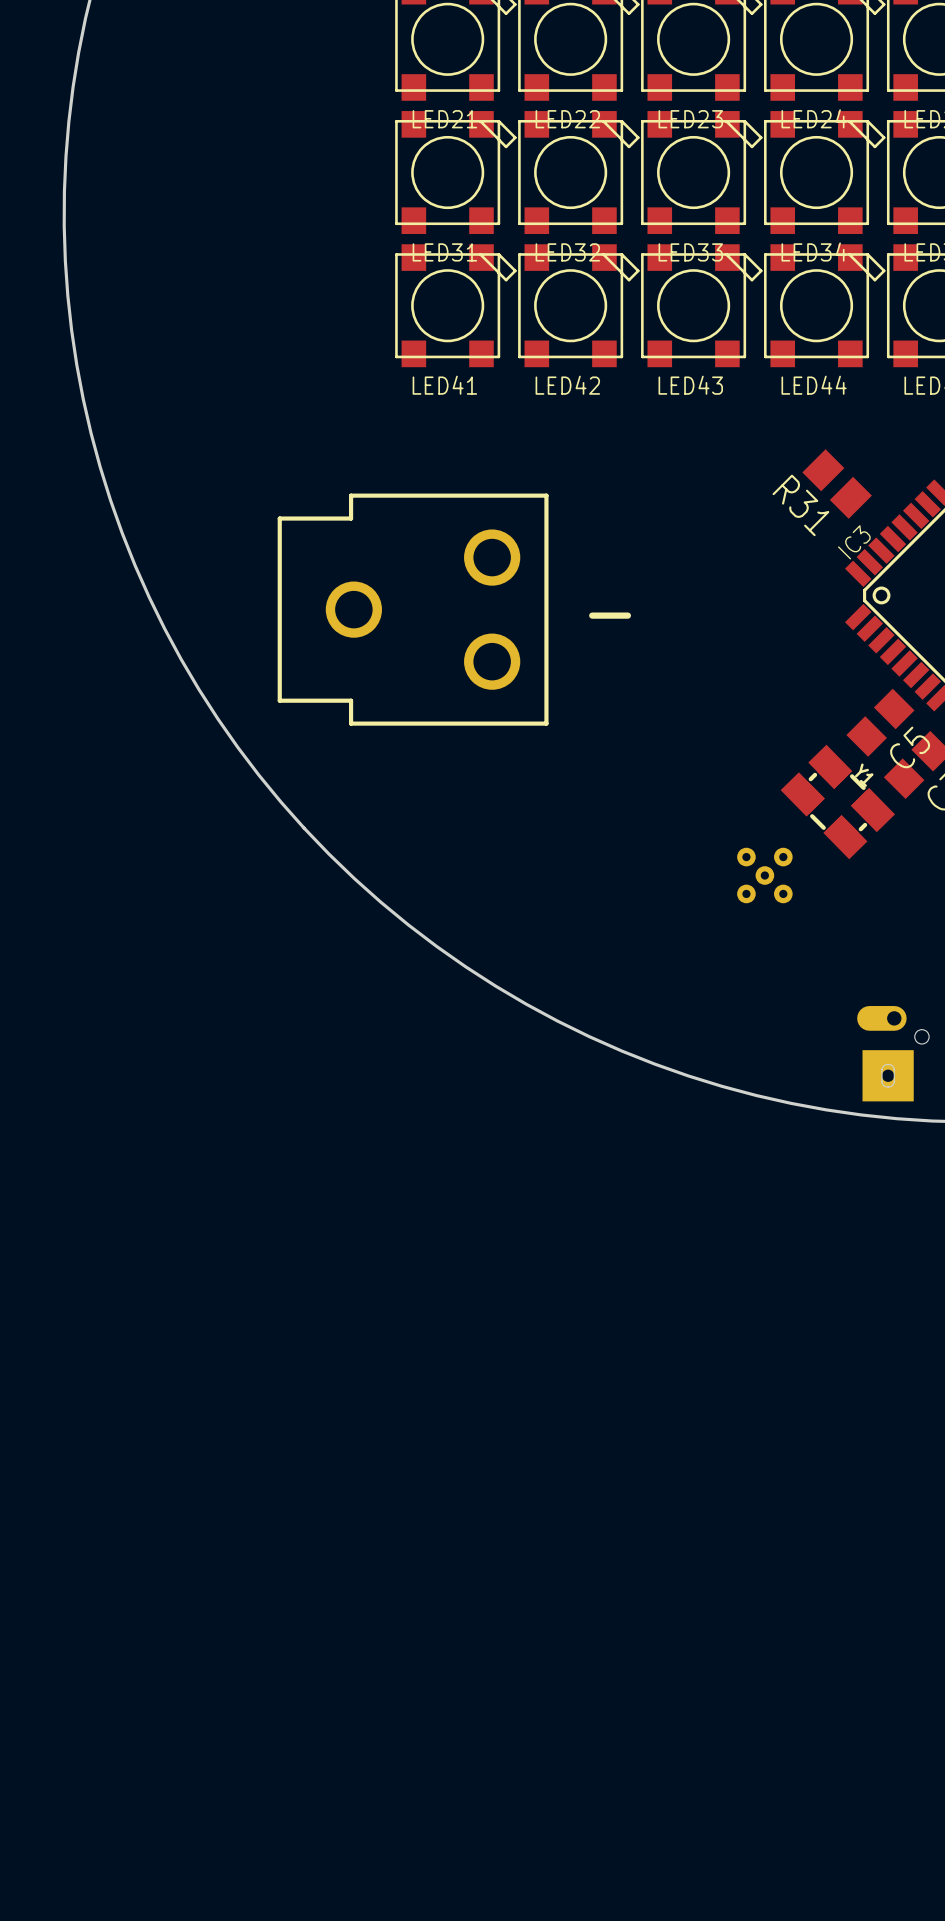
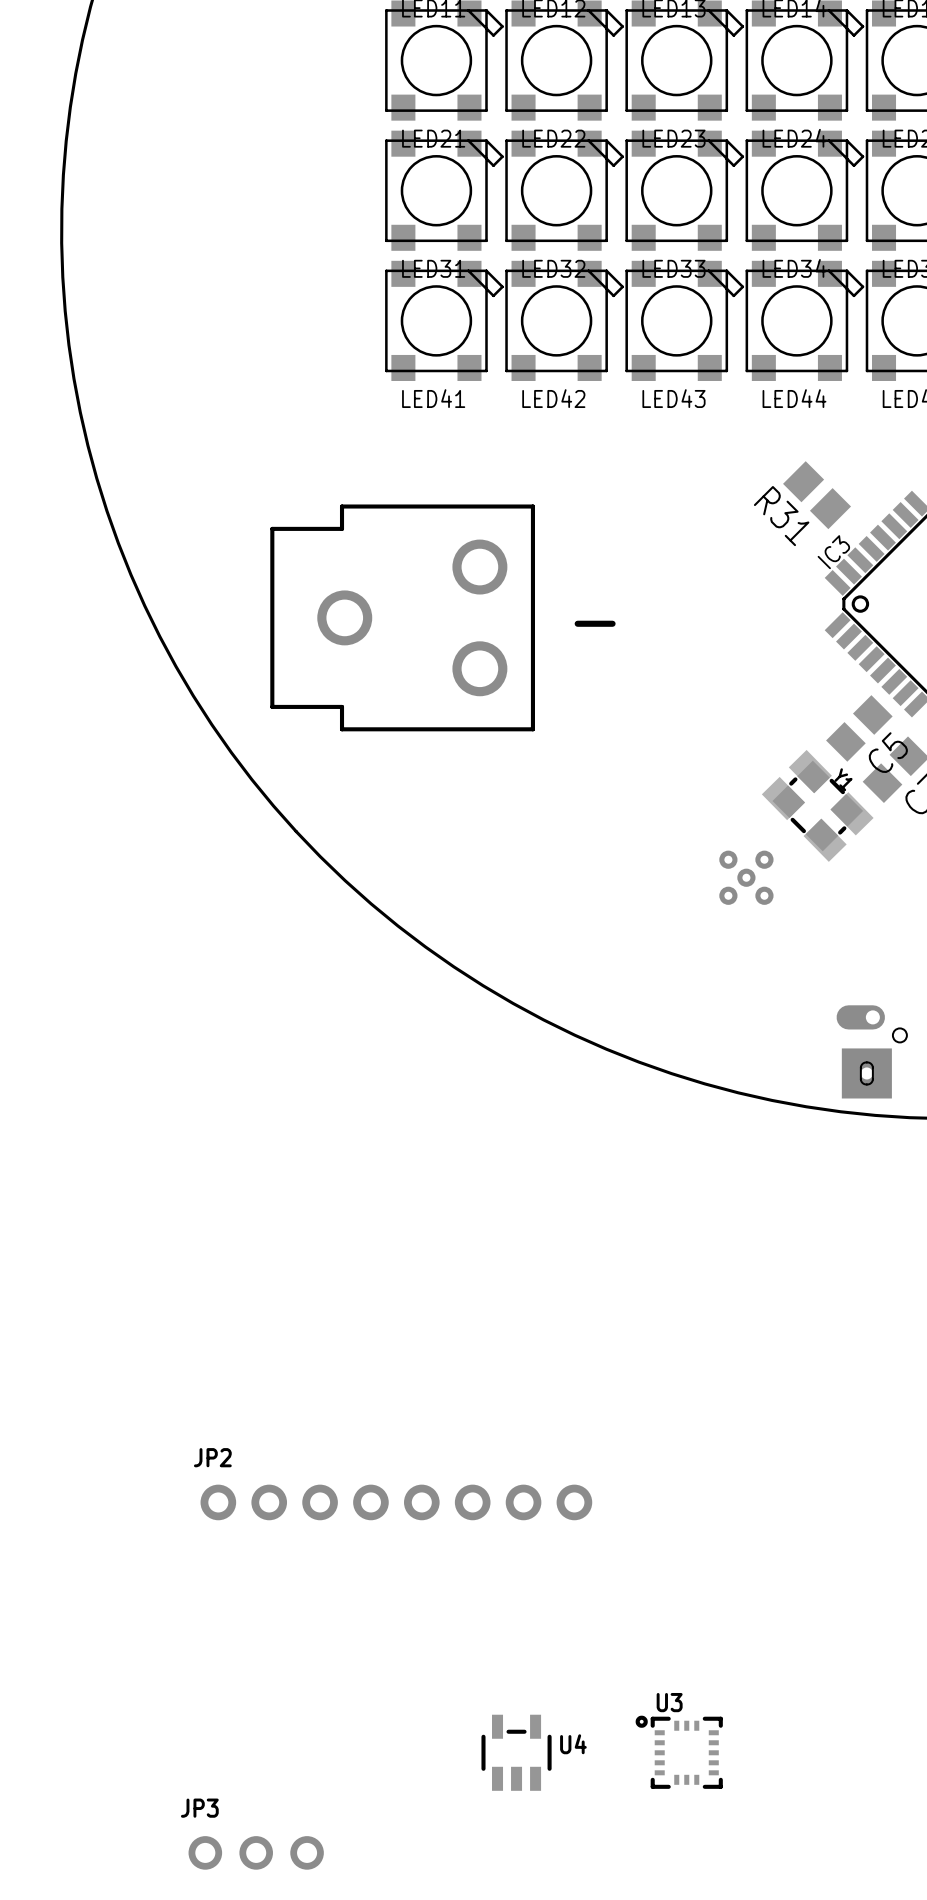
JP2: none -> (396, 1502)
U4: none -> (516, 1752)
U3: none -> (679, 1752)
JP3: none -> (256, 1852)

